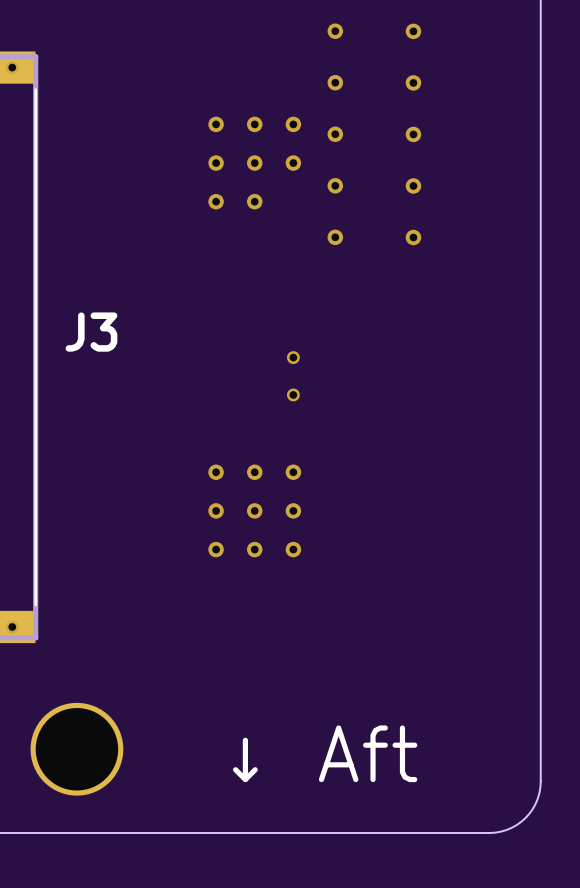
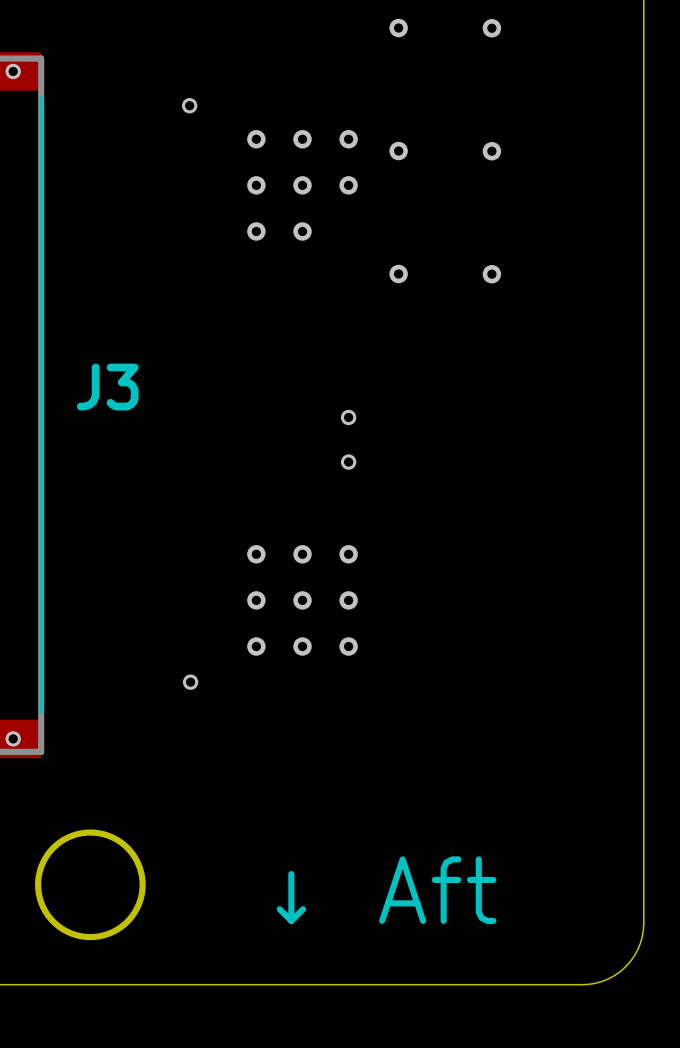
via: (335, 82) -> none
via: (413, 82) -> none
via: none -> (189, 105)
via: (335, 185) -> none
via: (413, 185) -> none
via: none -> (190, 682)

